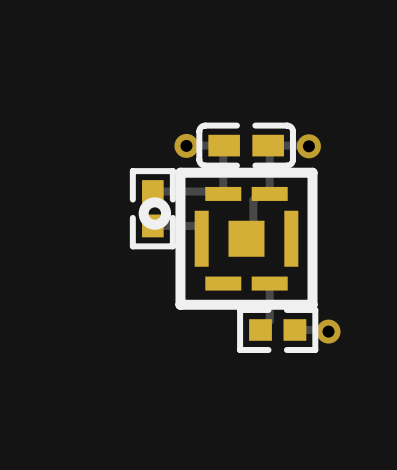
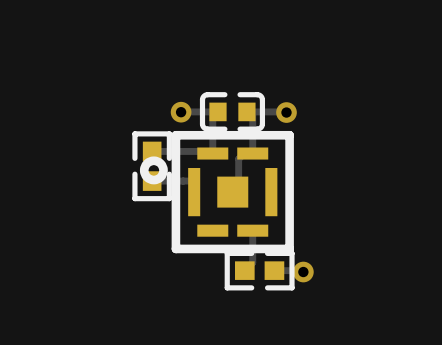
part footprint: [196, 122, 296, 169] -> [199, 92, 266, 132]

